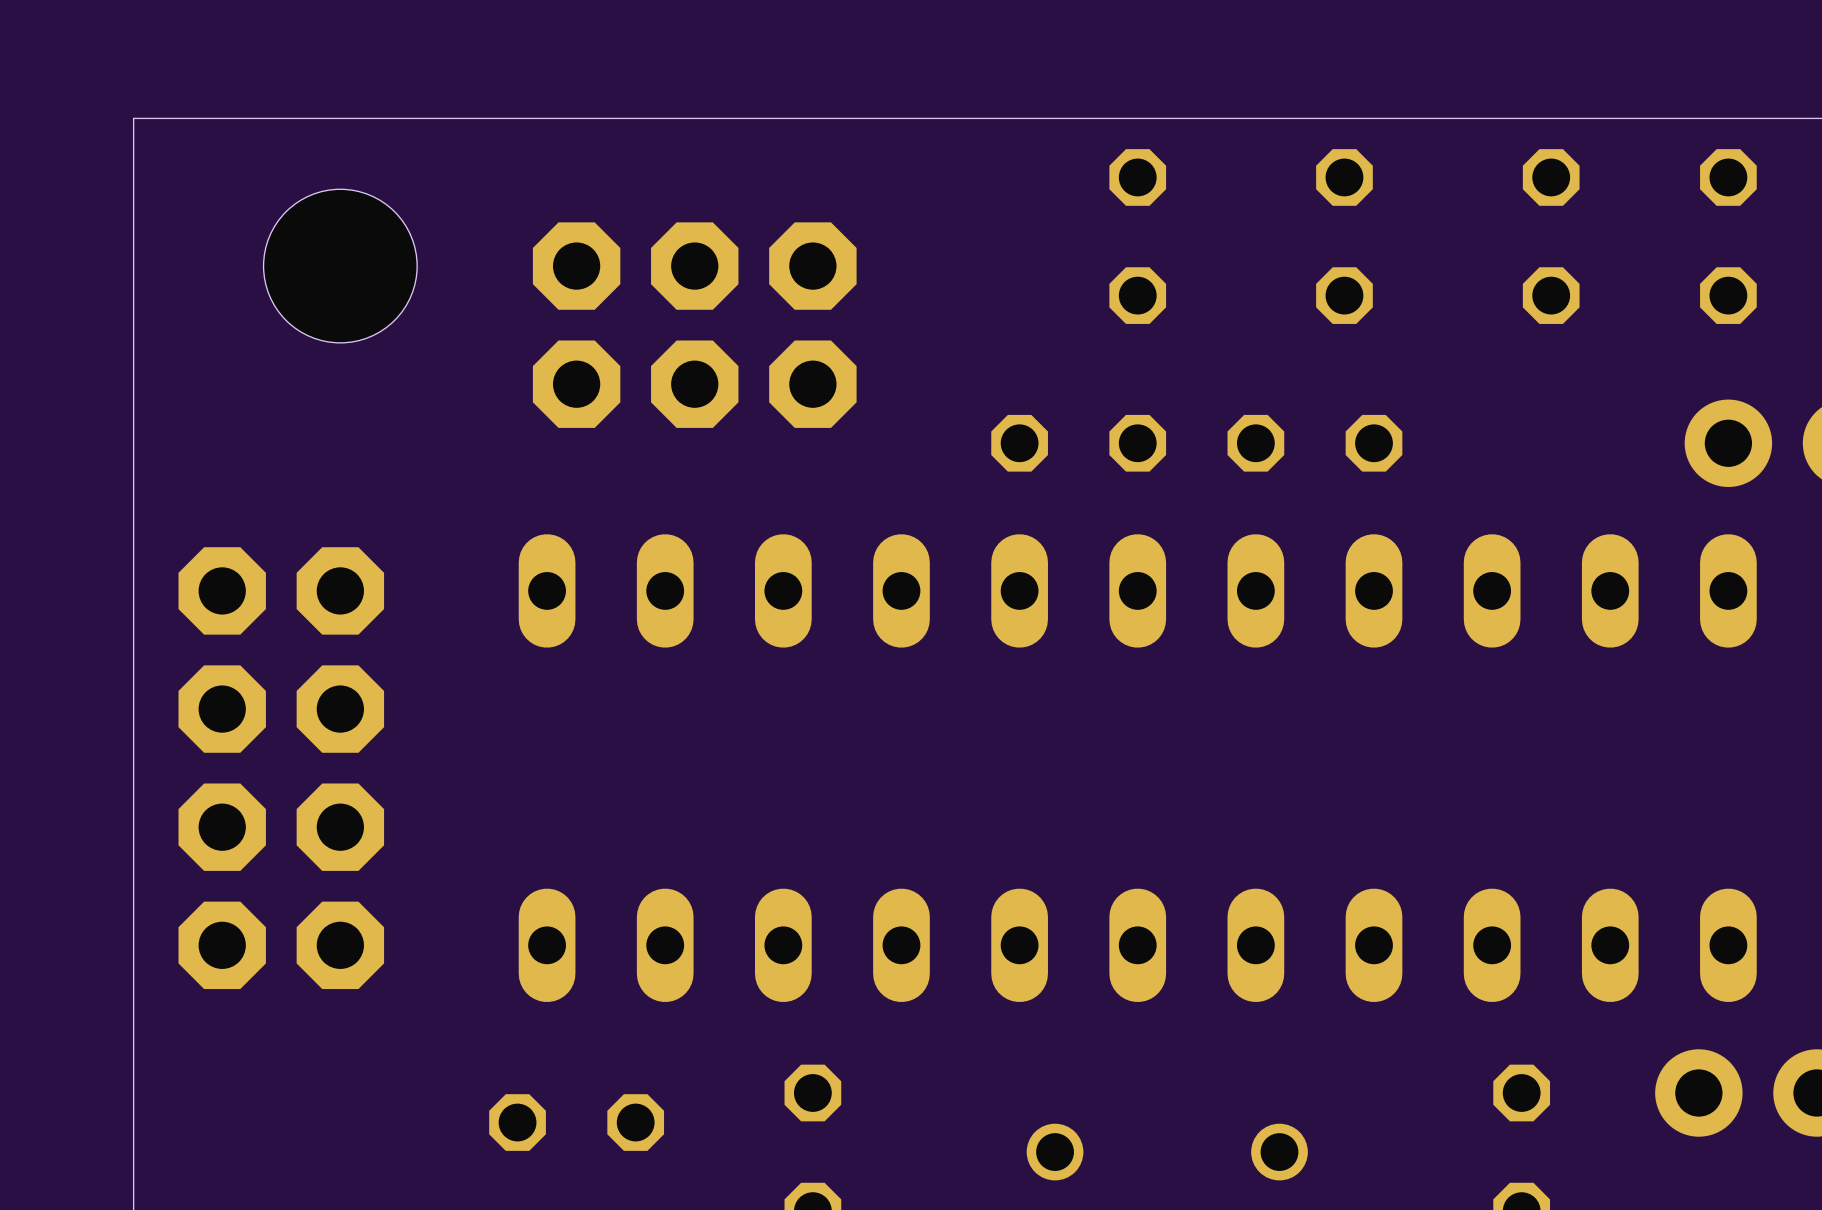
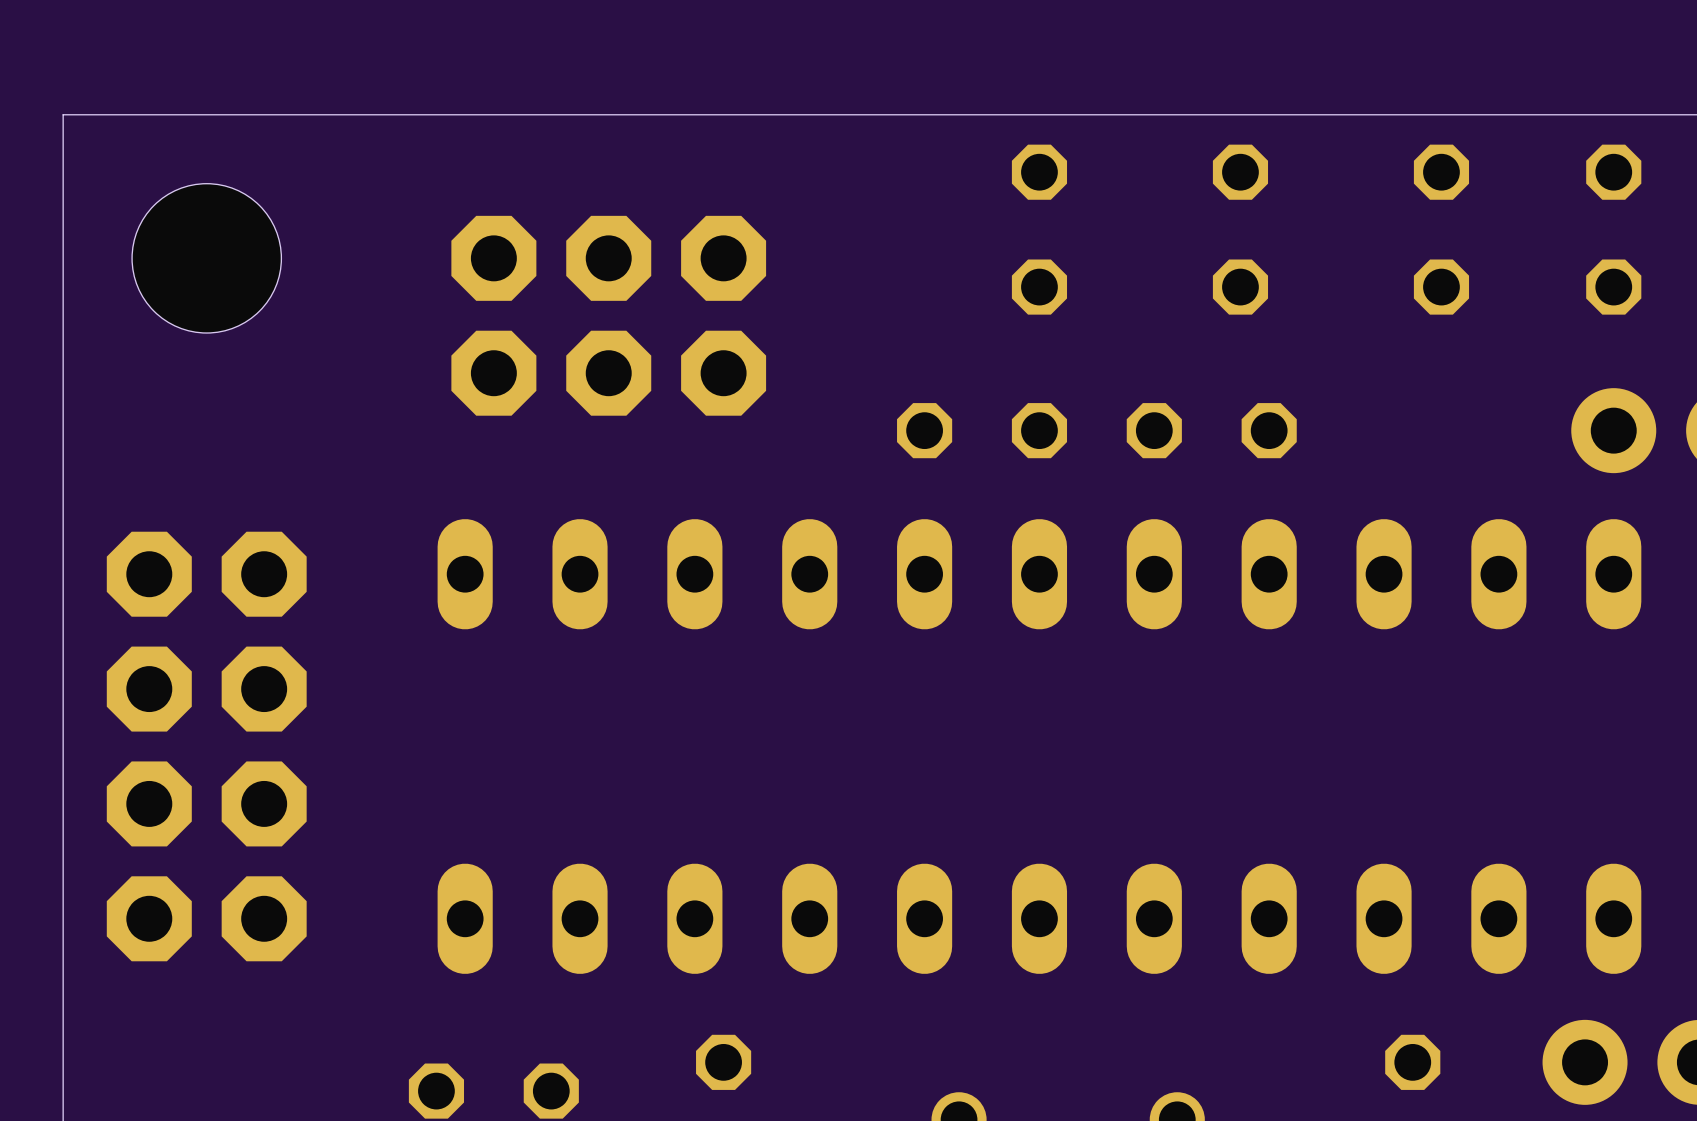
part position: (340, 266) -> (206, 258)

